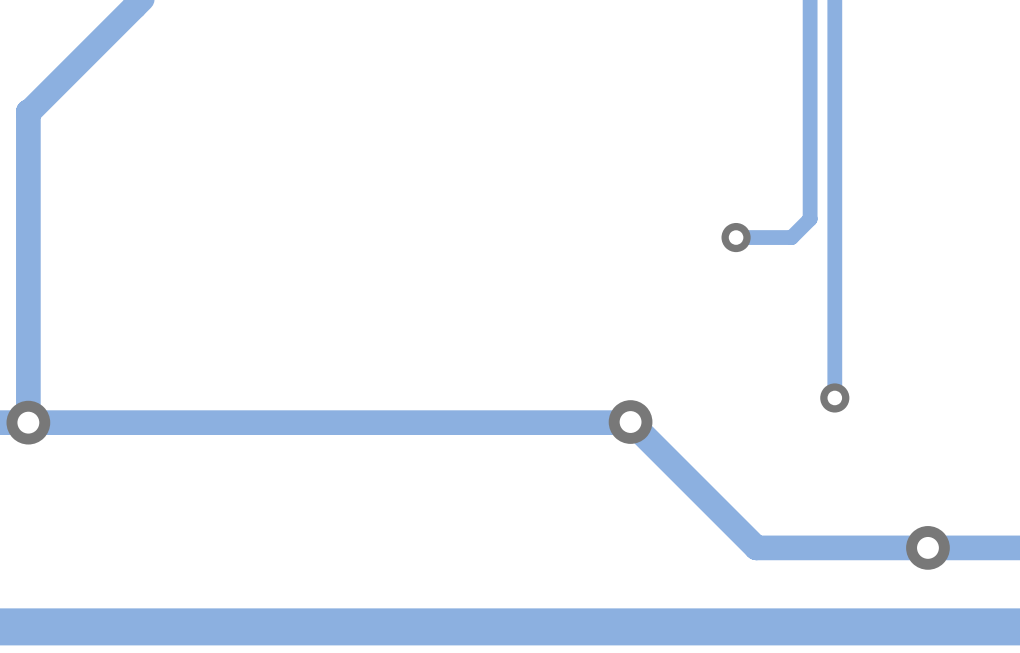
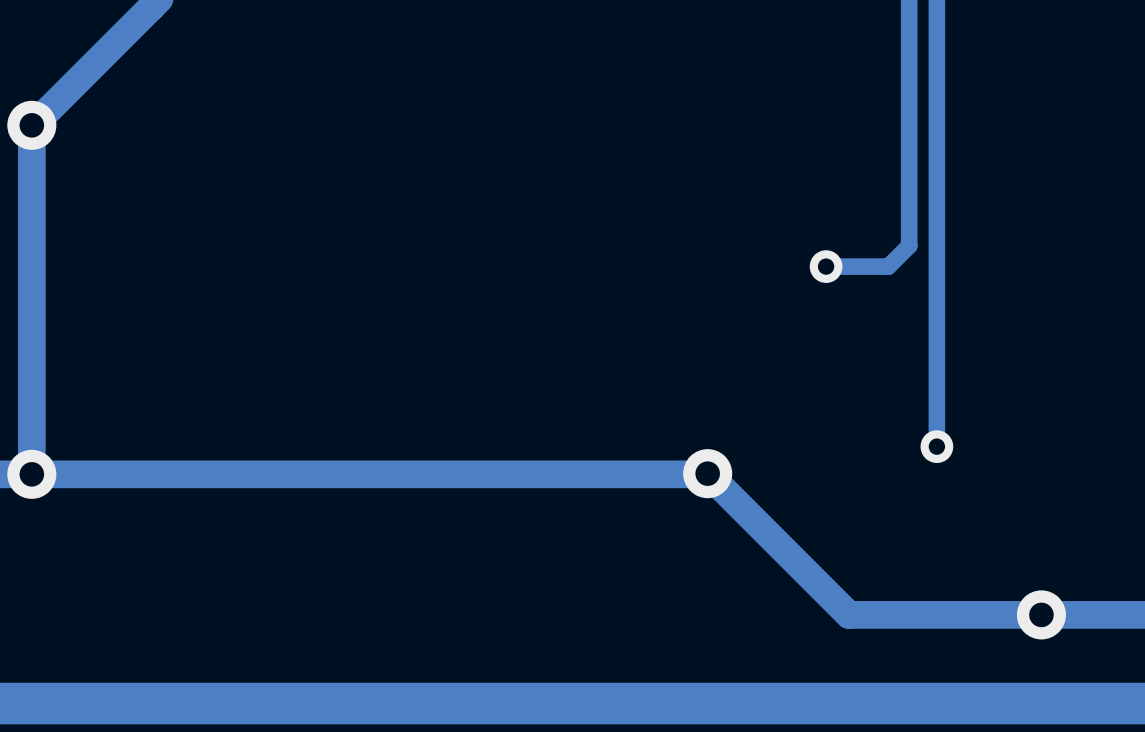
via: none -> (31, 125)

